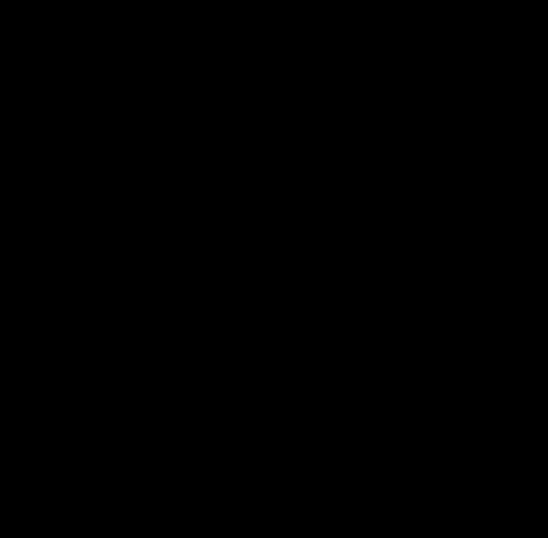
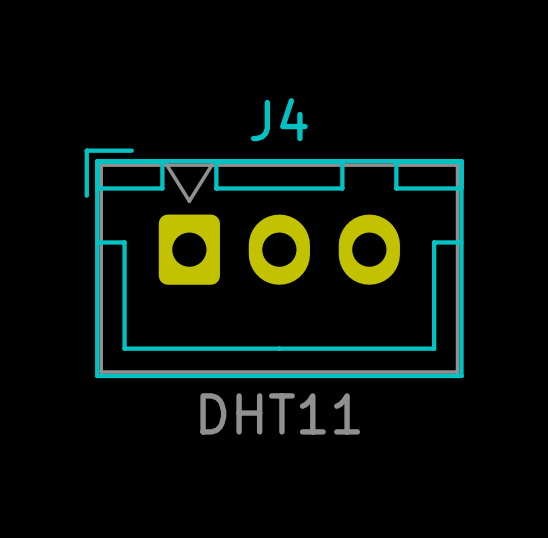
J4: none -> DHT11 (274, 263)

